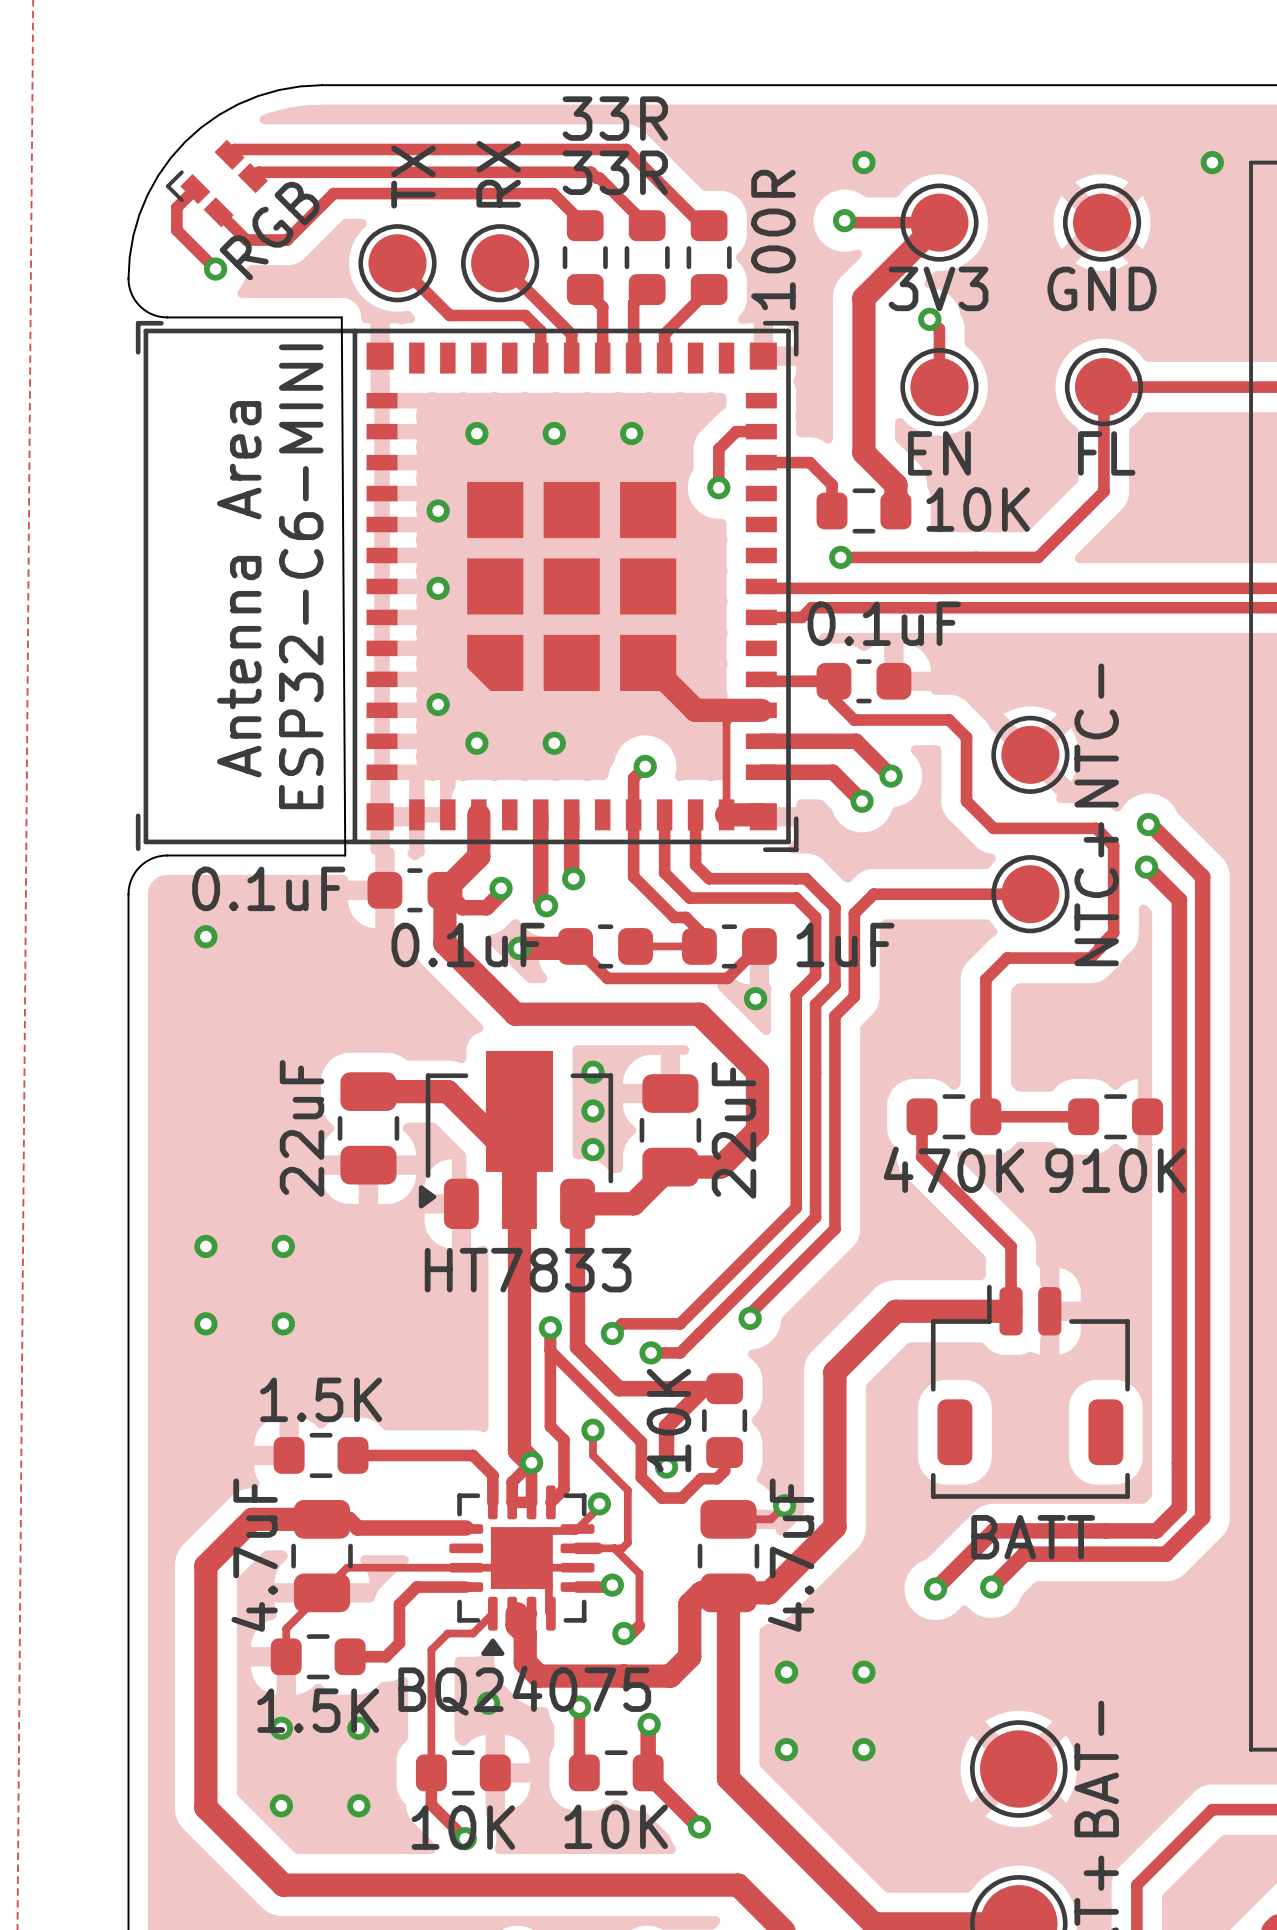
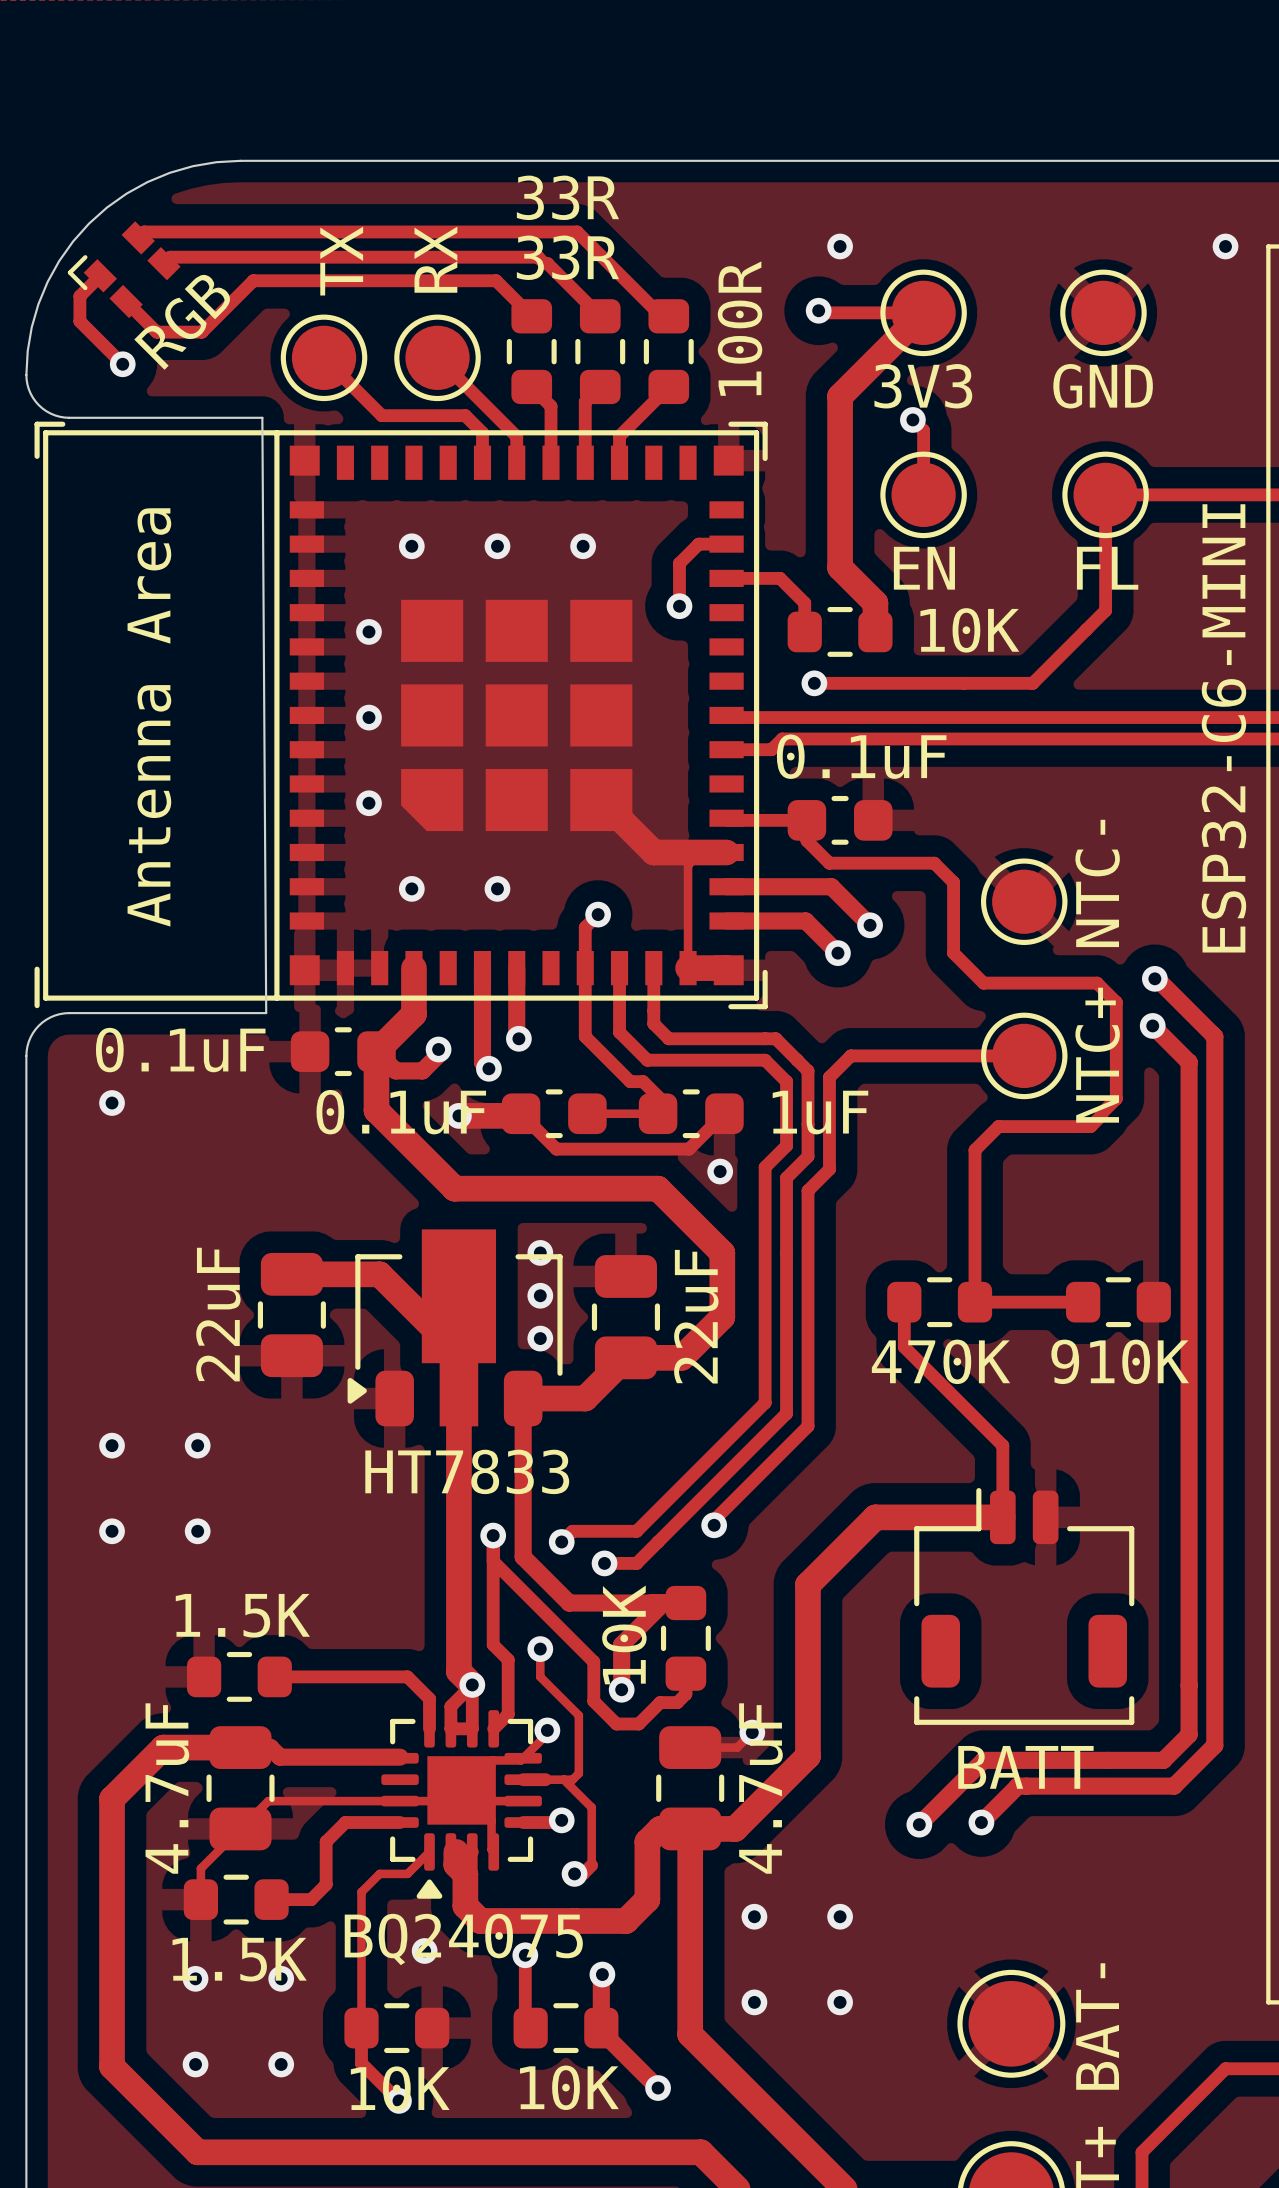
part value position: ESP32-C6-MINI (301, 576) -> ESP32-C6-MINI (1223, 728)
via position: (438, 704) -> (368, 803)

